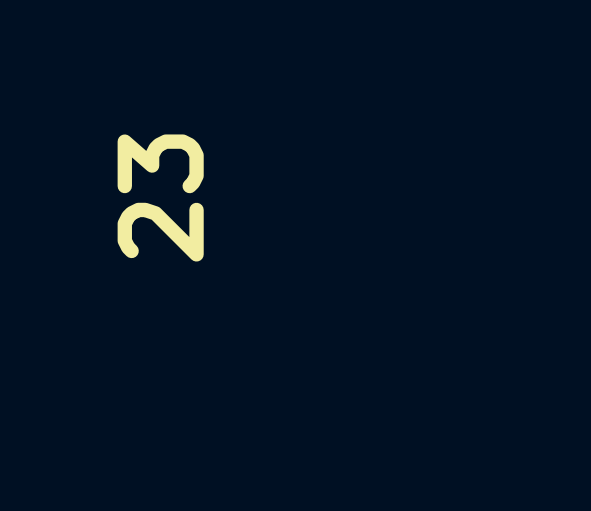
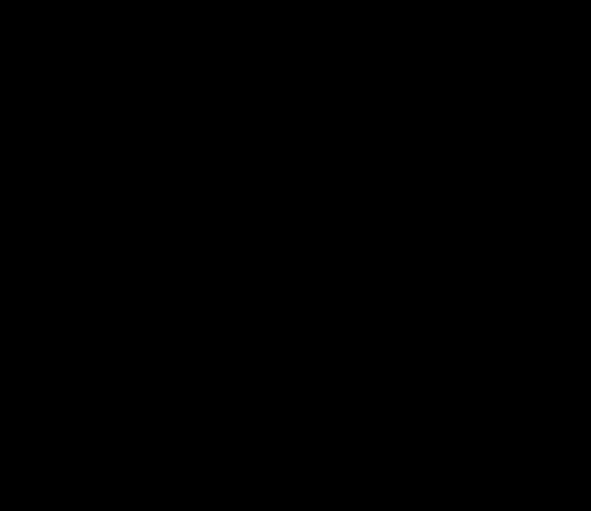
text: 23 (160, 198) -> none

